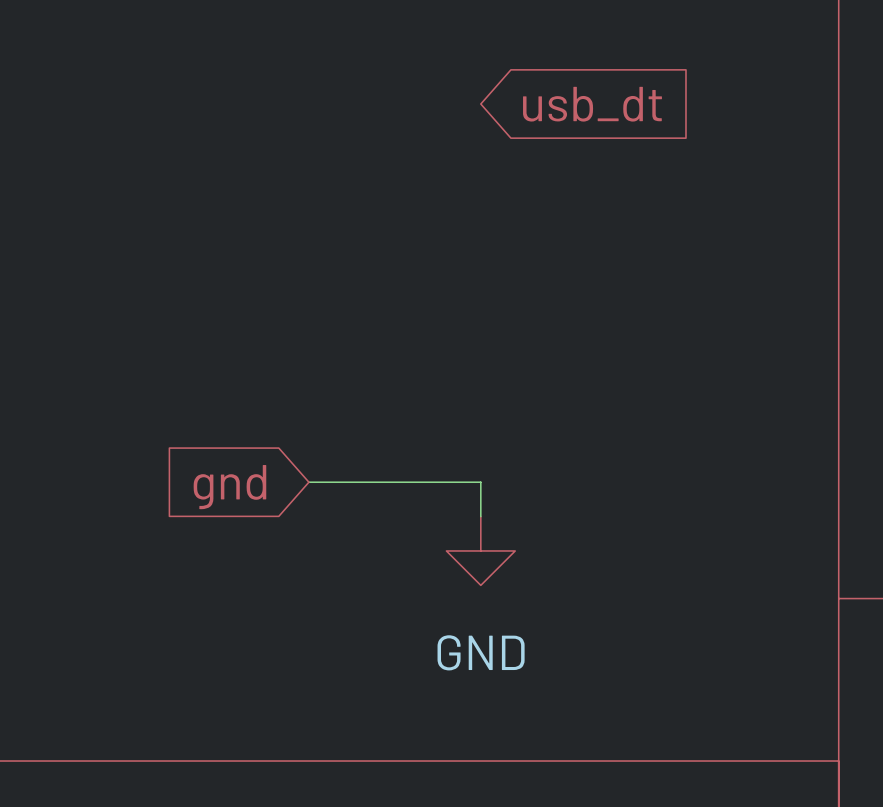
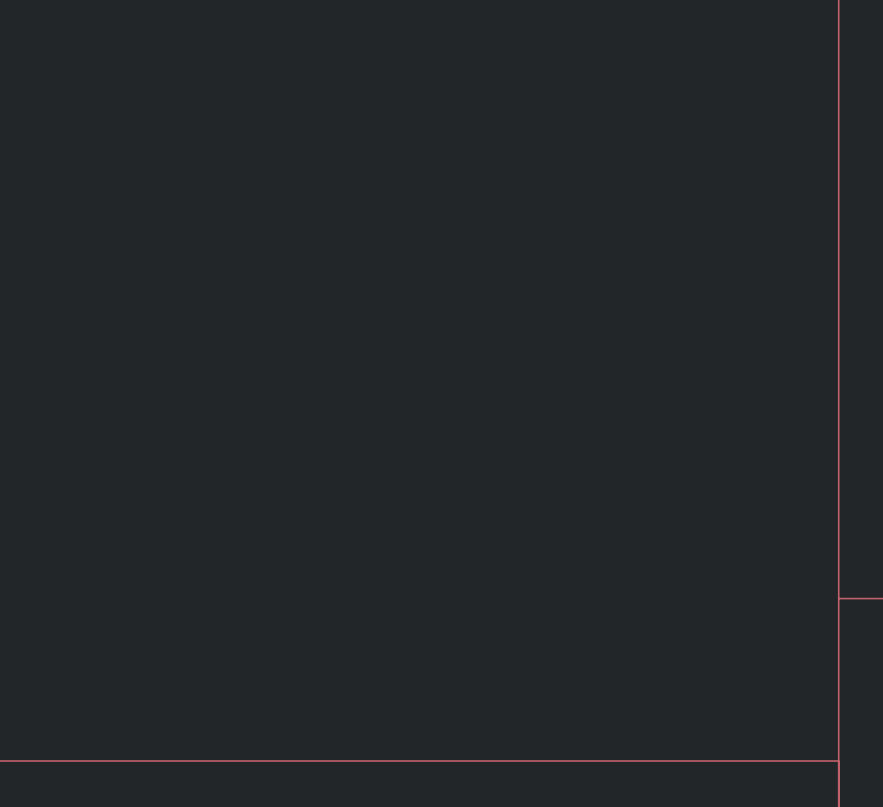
global label: usb_dt (592, 104) -> none
wire: (308, 482) (480, 482) (480, 516) -> none
global label: gnd (229, 487) -> none
power symbol: GND (480, 550) -> none

